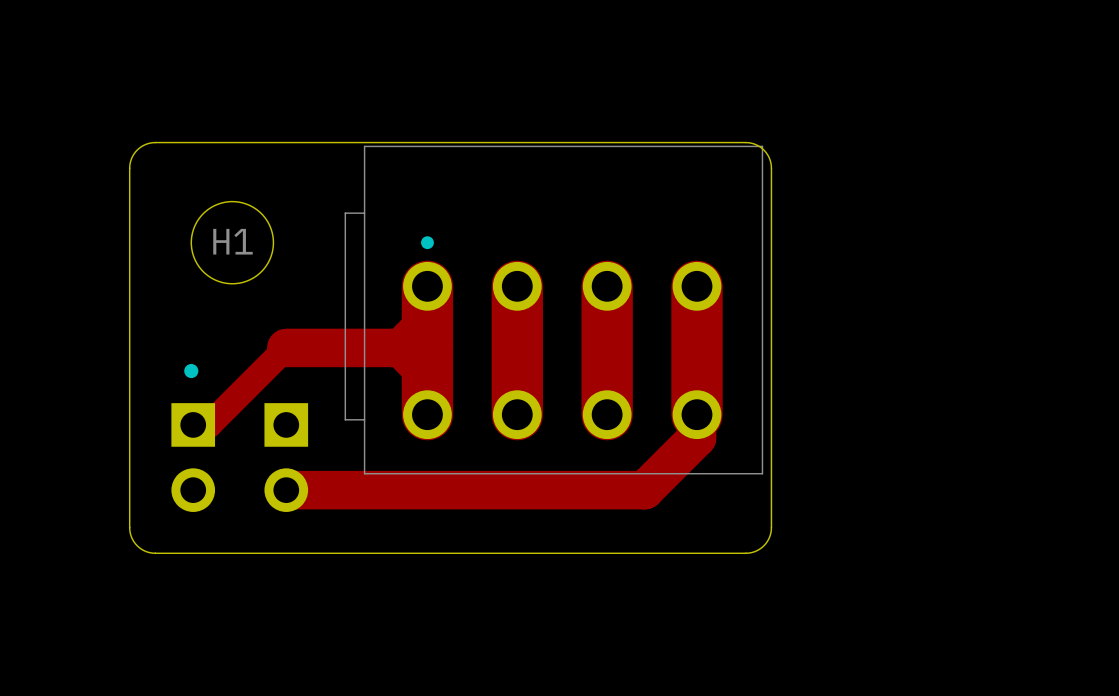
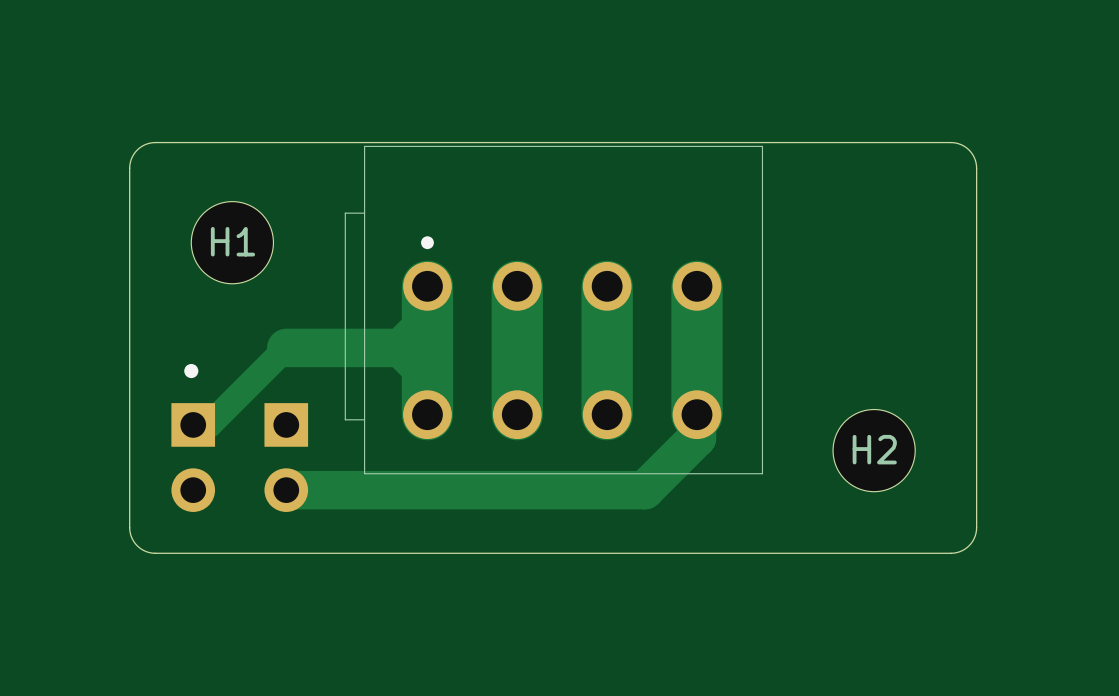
board edge: (745, 142) (756, 145) (763, 150) (770, 159) (771, 168) (771, 530) (767, 541) (761, 547) (745, 553) -> (745, 142) (953, 142) (962, 145) (971, 152) (976, 168) (976, 527) (972, 541) (964, 549) (950, 553) (745, 553)
H2: none -> (874, 450)

